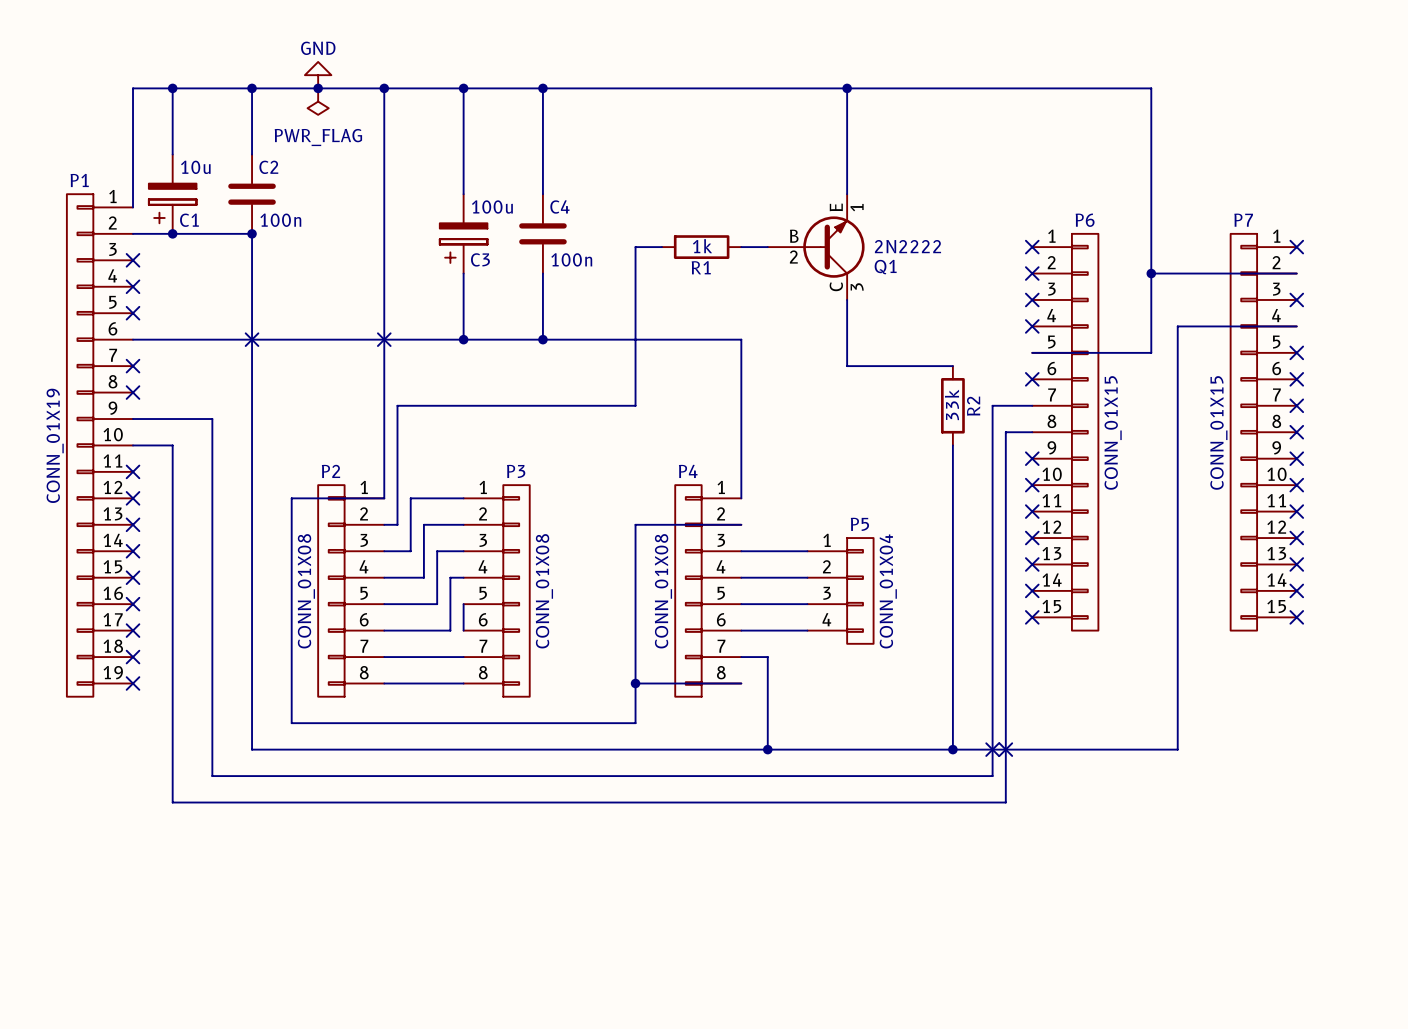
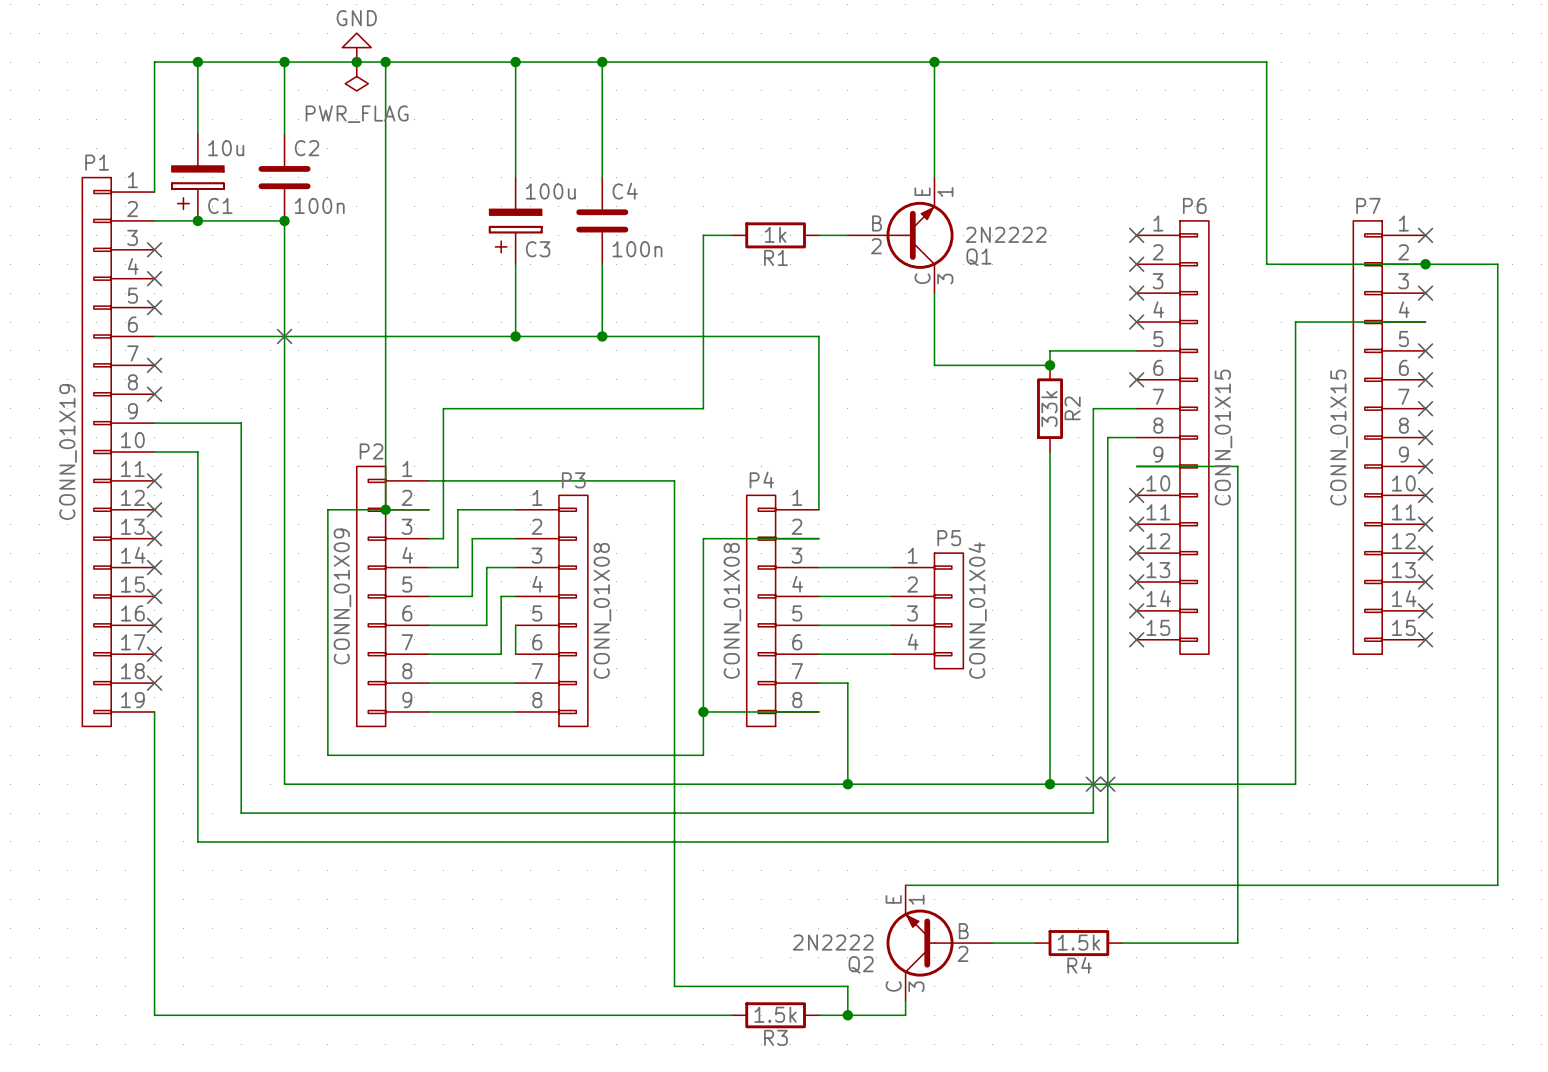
wire: (384, 88) (384, 498) -> (385, 62) (385, 509)
junction position: (384, 88) -> (385, 62)
wire: (1151, 273) (1151, 352) (1032, 352) -> (1050, 365) (1050, 350) (1136, 350)
junction: (1151, 273) -> none
wire: none -> (1425, 264) (1497, 264) (1497, 885) (905, 885)
junction: none -> (1425, 264)
no-connect mark: (384, 339) -> none
junction: none -> (1050, 365)
wire: none -> (1136, 466) (1237, 466) (1237, 943) (1122, 943)
no-connect mark: (1032, 458) -> none
wire: none -> (428, 480) (674, 480) (674, 986) (847, 986) (847, 1015)
P2 symbol: [318, 485, 385, 697] -> [356, 466, 429, 727]
junction: none -> (385, 509)
P2 value: CONN_01X08 (306, 591) -> CONN_01X09 (342, 596)
wire: none -> (154, 711) (154, 1015) (732, 1015)
no-connect mark: (133, 683) -> none
Q2: none -> 2N2222 (939, 943)
wire: none -> (992, 943) (1035, 943)
R4: none -> 1.5k (1078, 943)
wire: none -> (905, 1000) (905, 1015) (818, 1015)
R3: none -> 1.5k (775, 1015)
junction: none -> (847, 1015)

